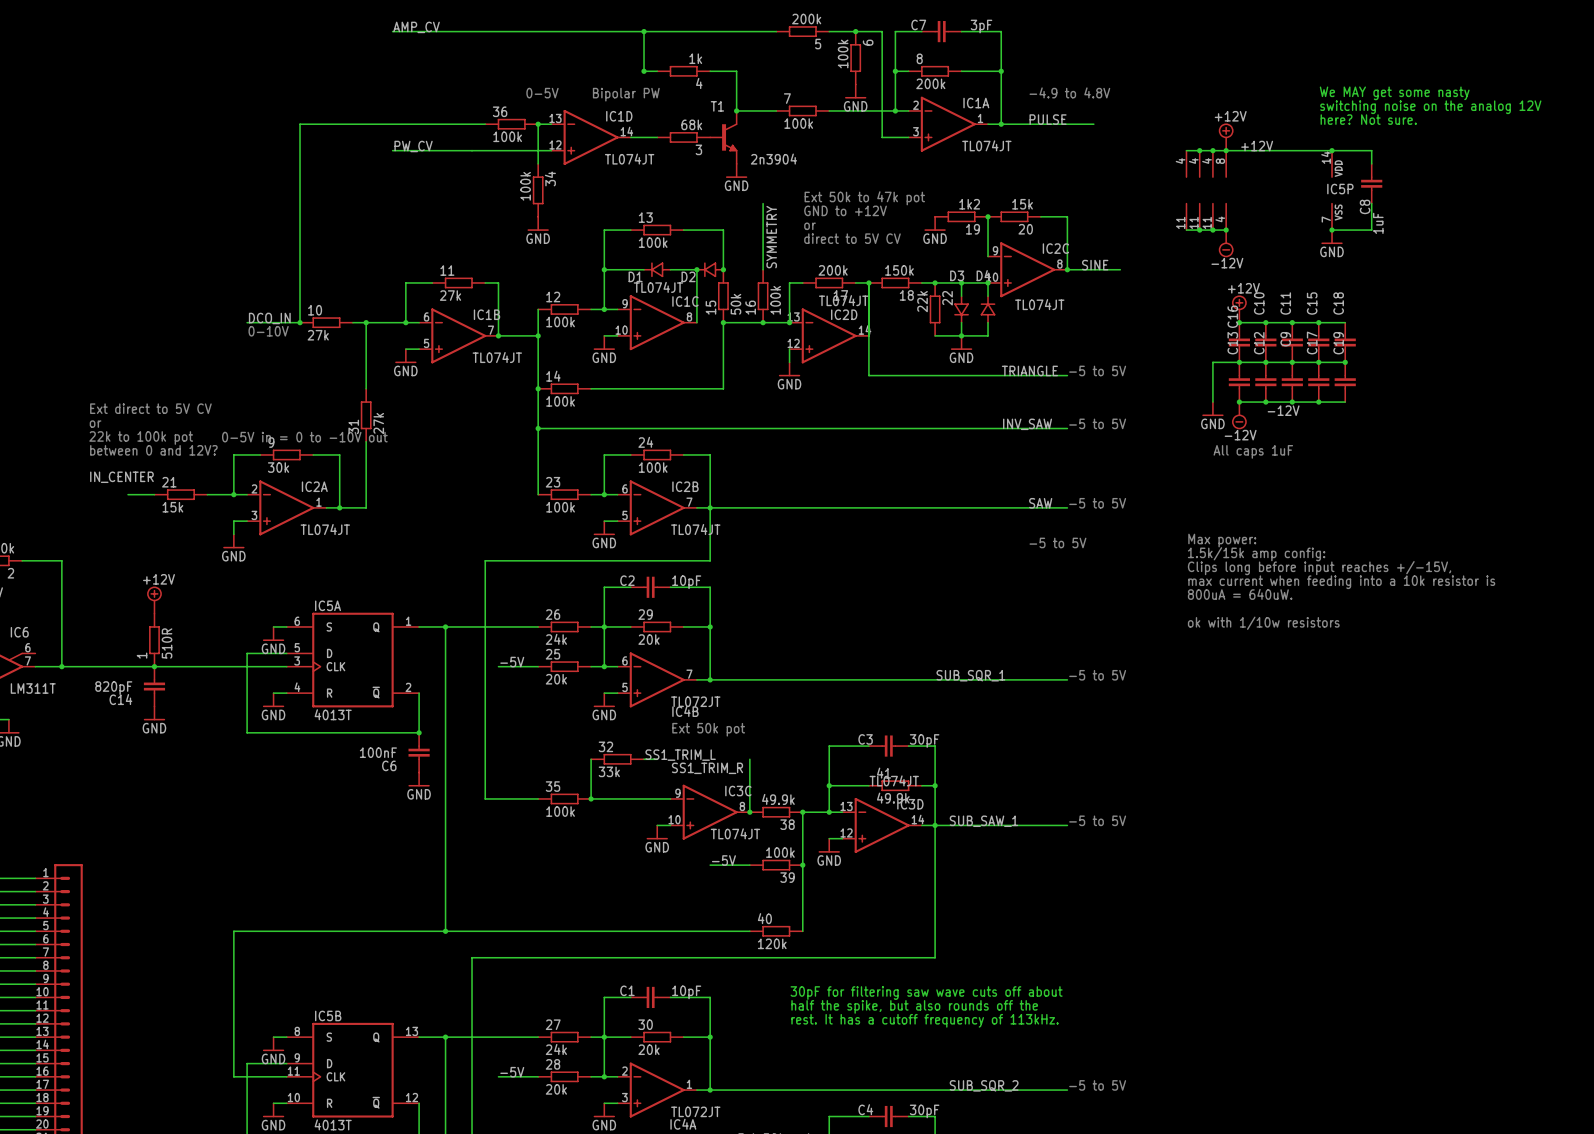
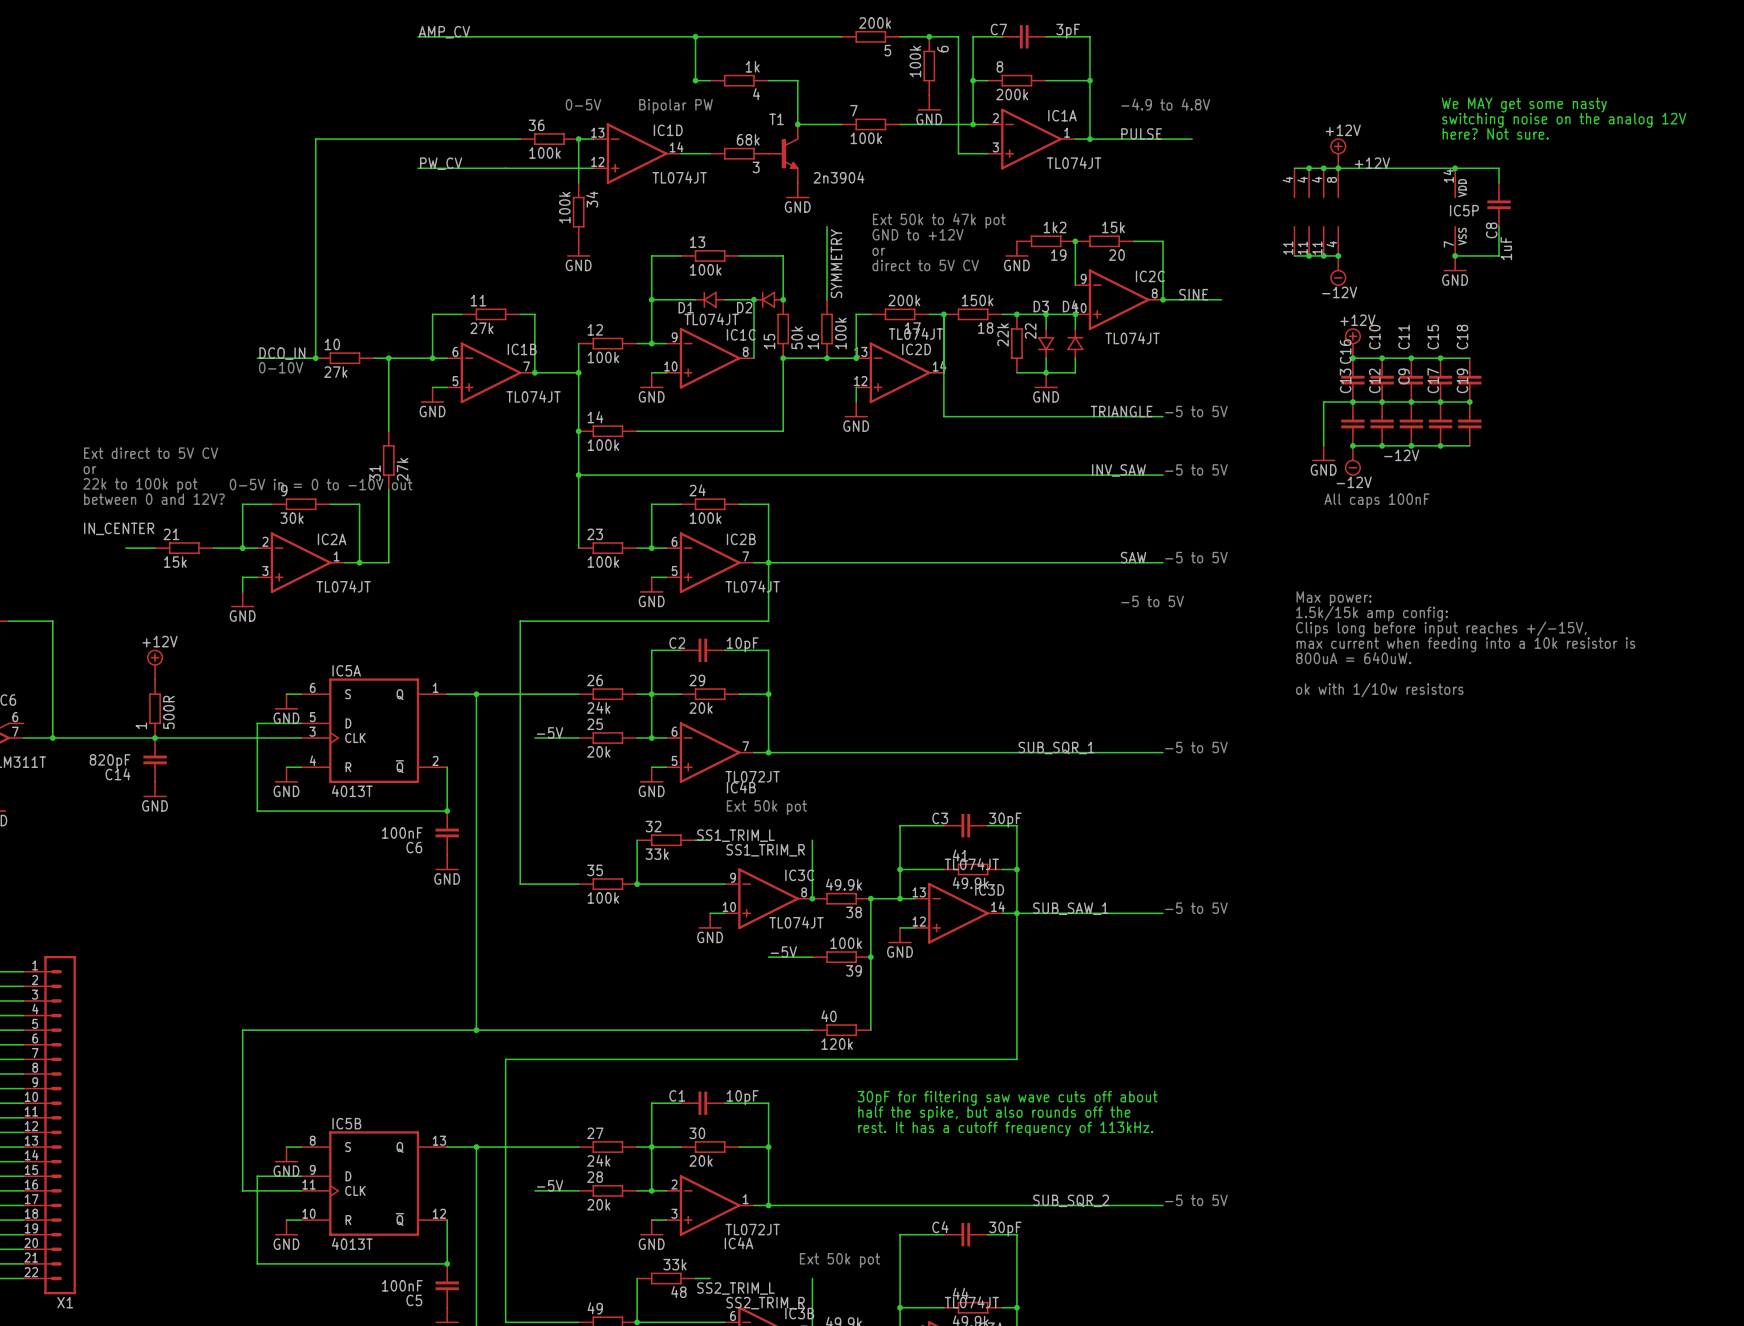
text: All caps 1uF (1253, 451) -> All caps 100nF (1377, 500)
1 value: 510R (167, 643) -> 500R (168, 712)

